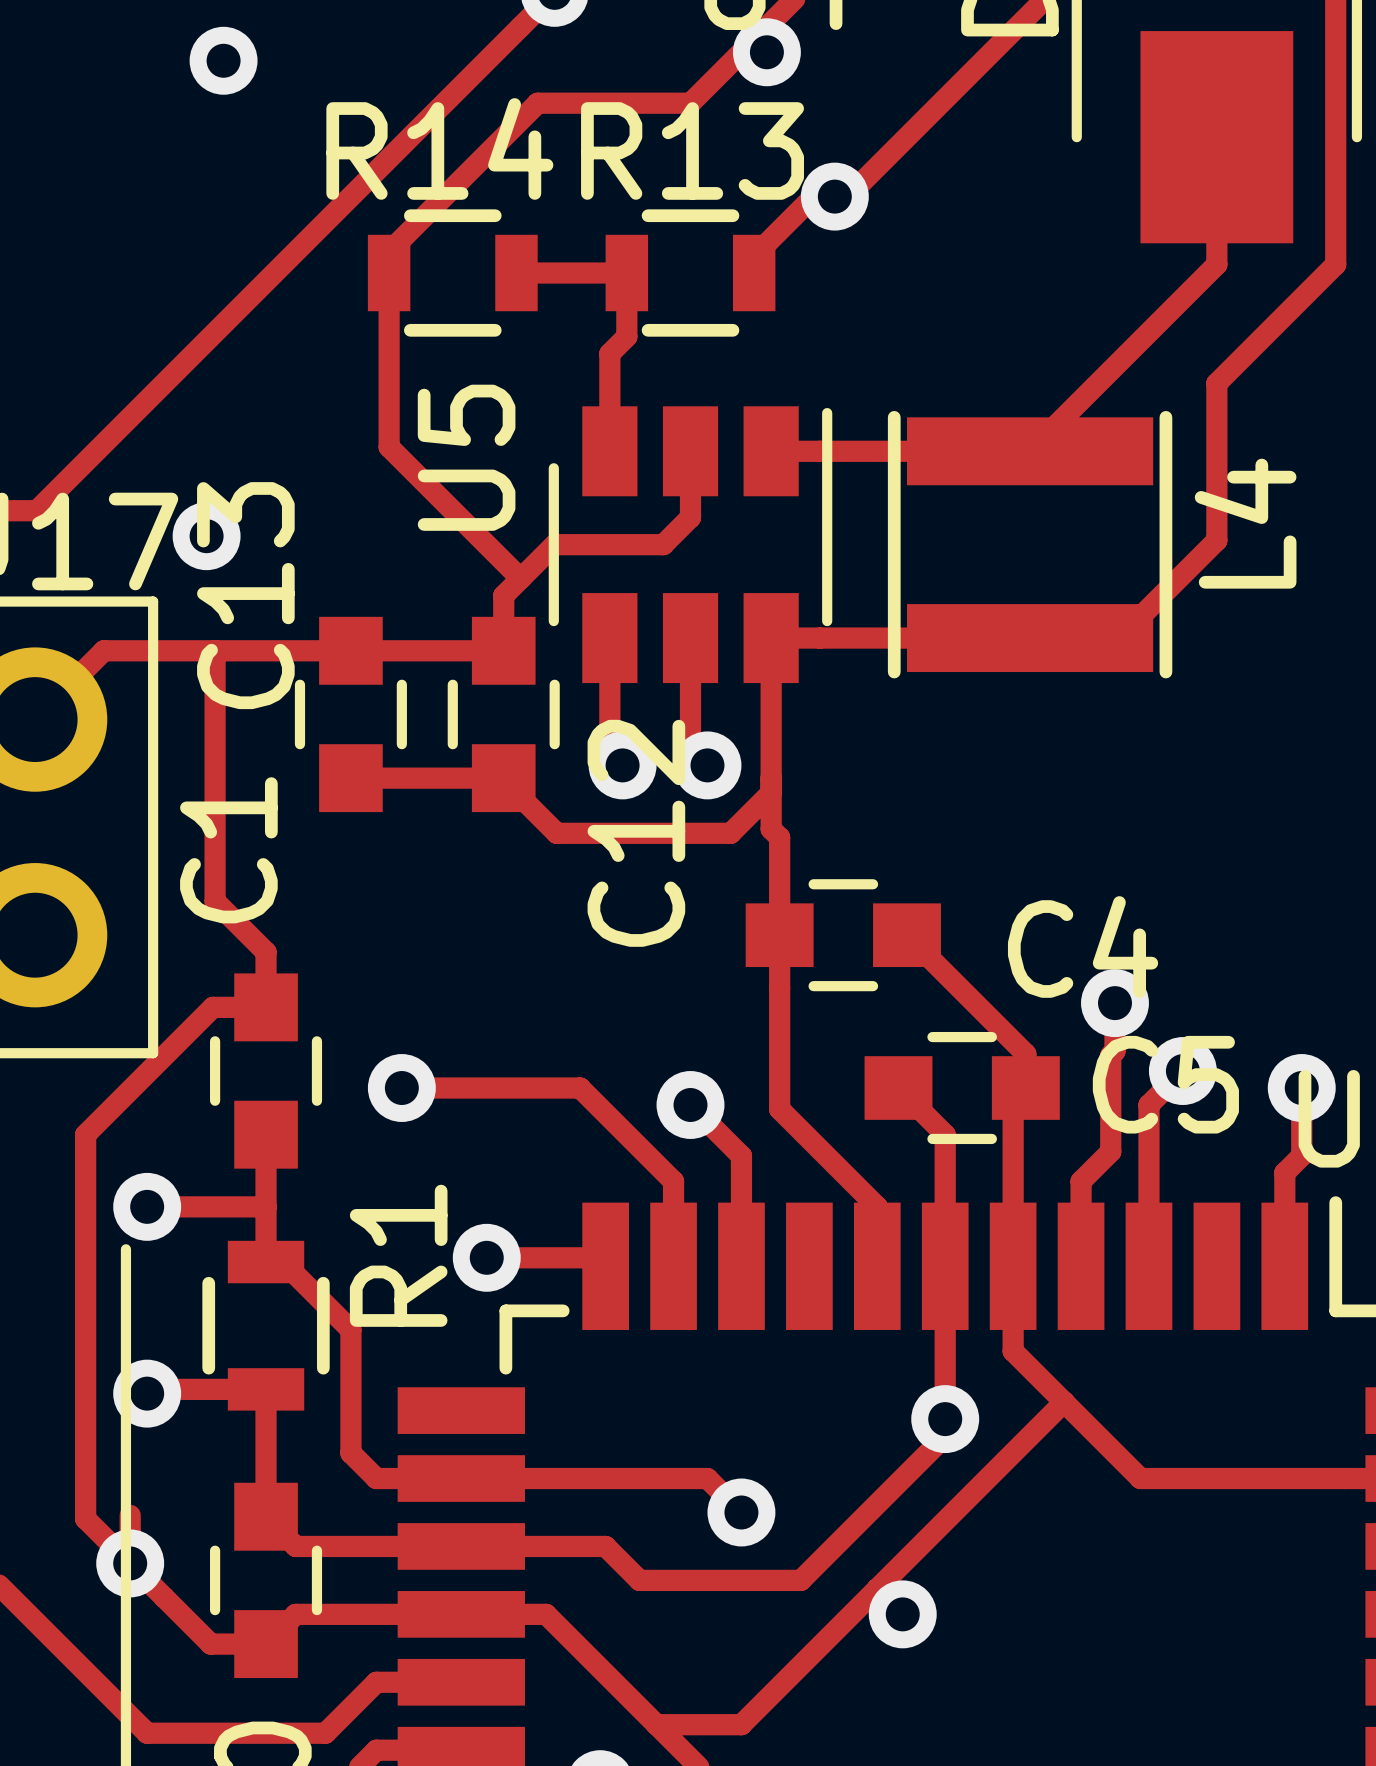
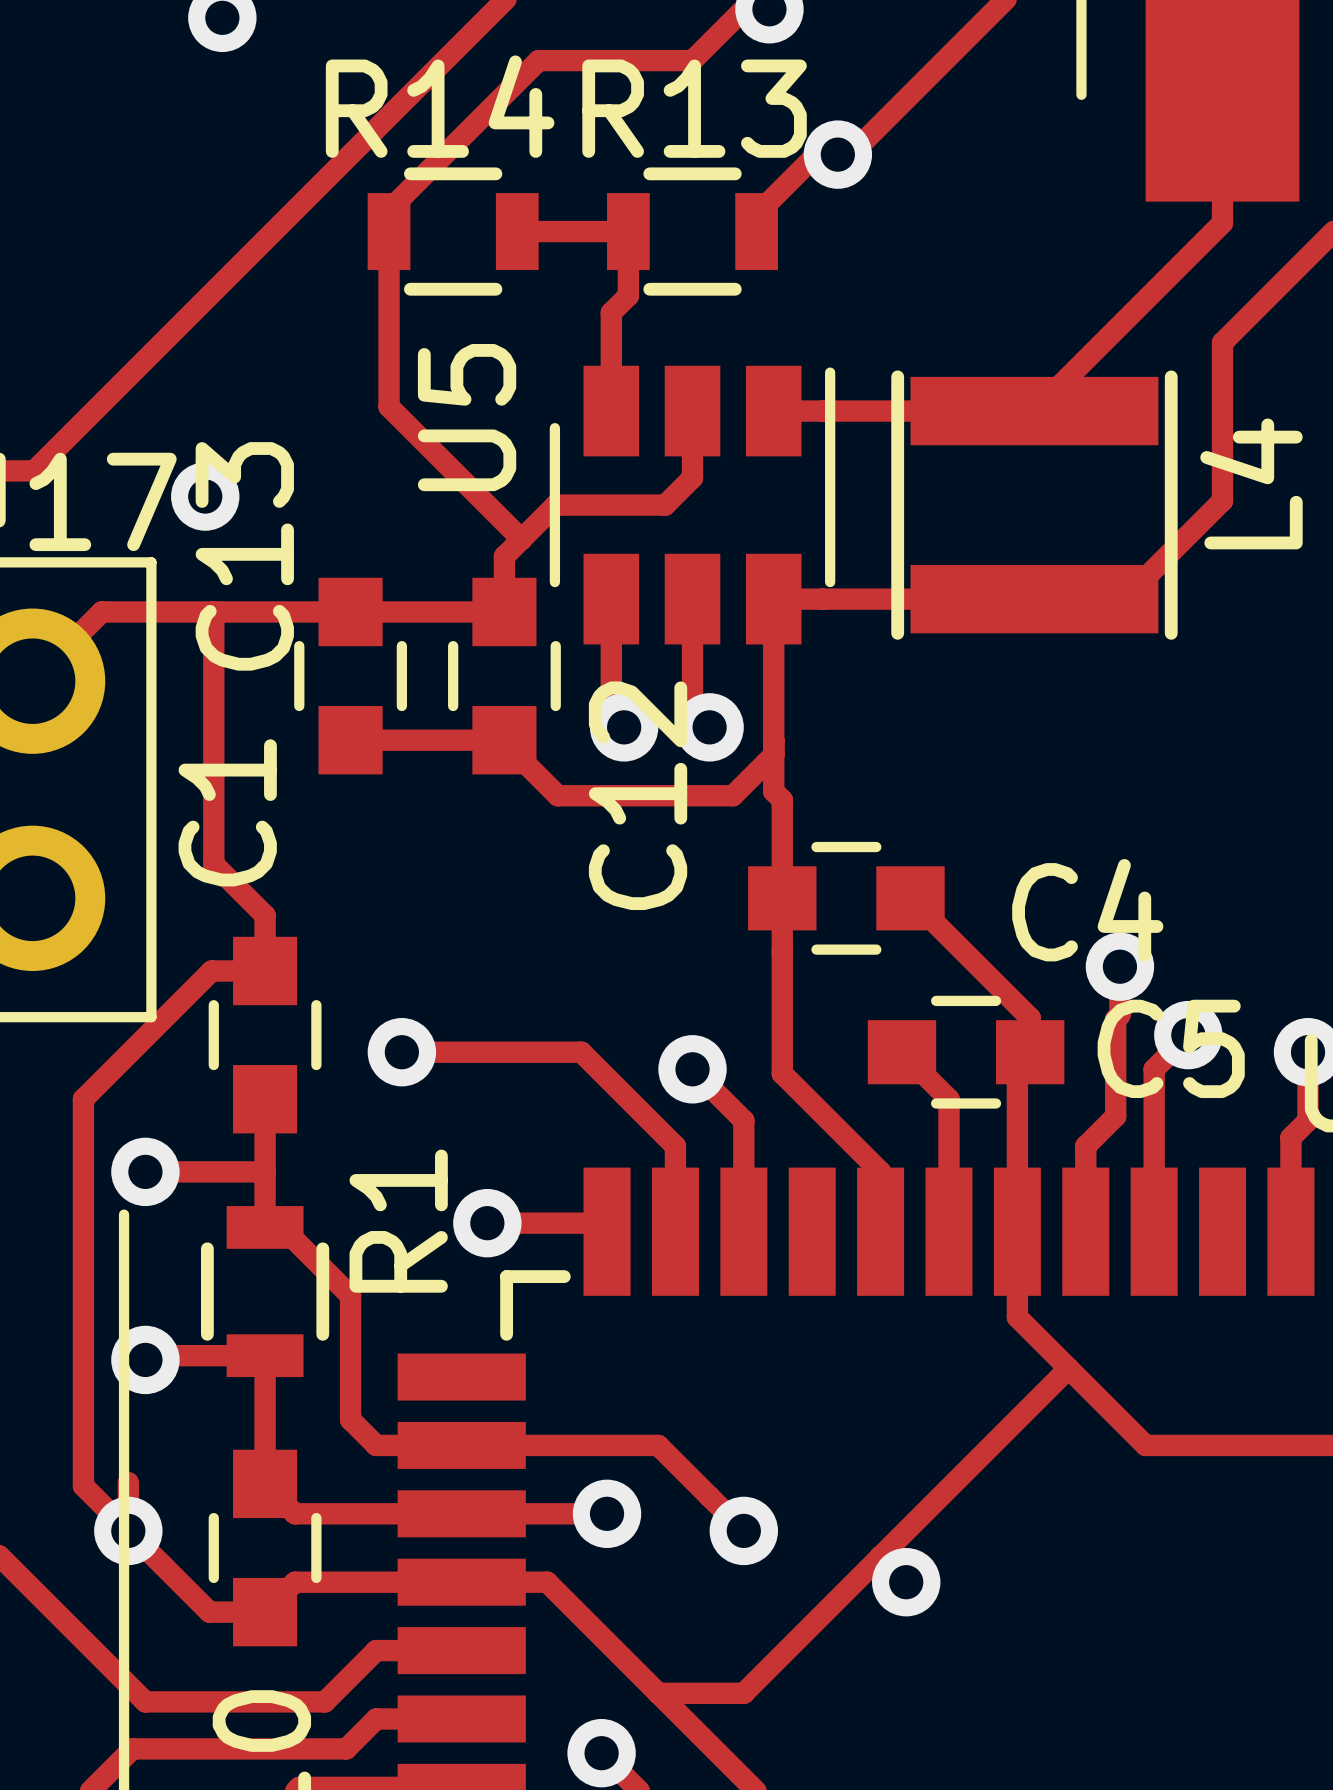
track: (945, 1266) (945, 1436) (800, 1580) (639, 1580) (605, 1546) -> none
via: (945, 1419) -> none
track: (656, 1478) (707, 1478) (741, 1512) -> (658, 1445) (743, 1530)
via position: (741, 1512) -> (743, 1530)
via: none -> (607, 1513)

